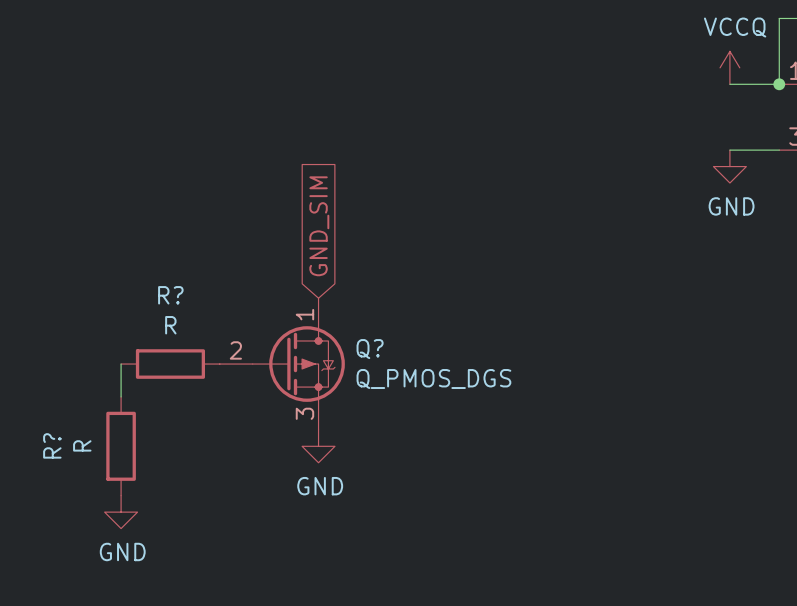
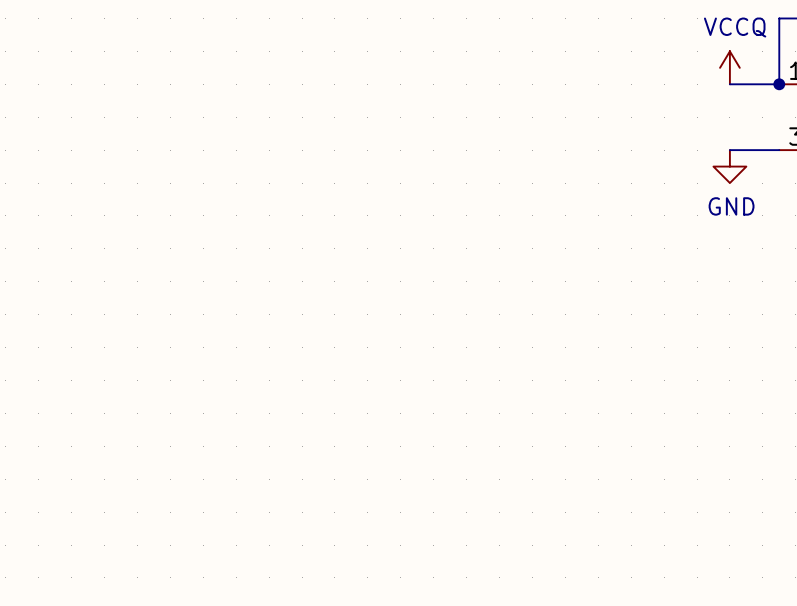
global label: GND_SIM (319, 226) -> none
wire: (121, 364) (121, 396) -> none
R?: R (170, 364) -> none
Q?: Q_PMOS_DGS (282, 364) -> none
R?: R (121, 446) -> none
power symbol: GND (318, 446) -> none
power symbol: GND (121, 512) -> none

